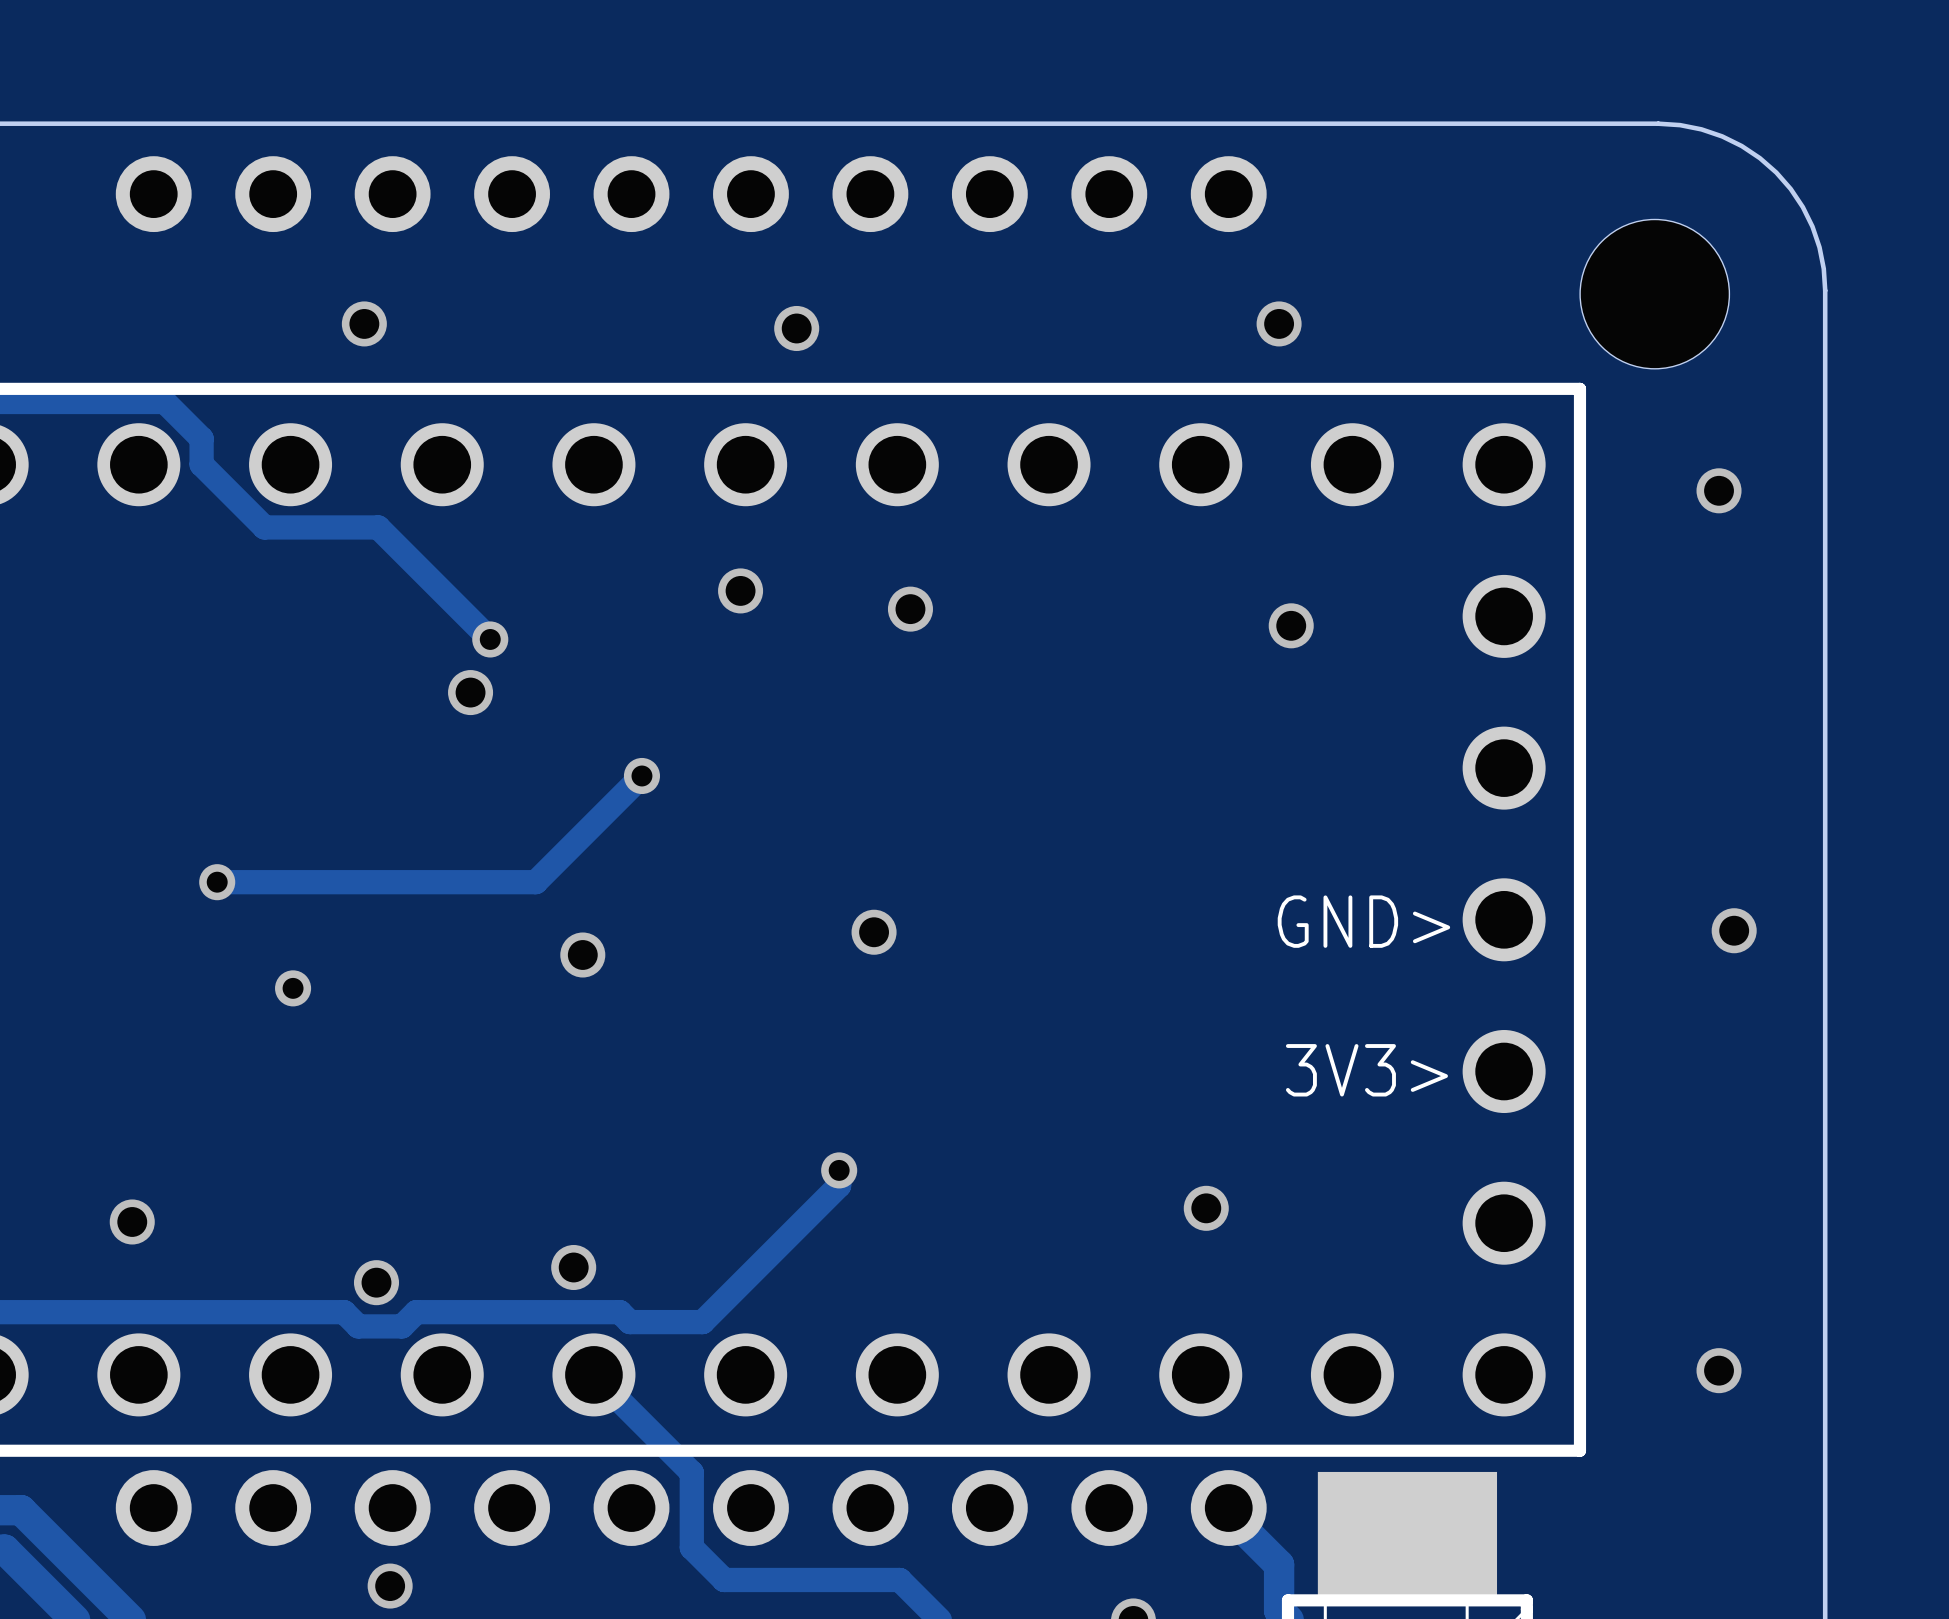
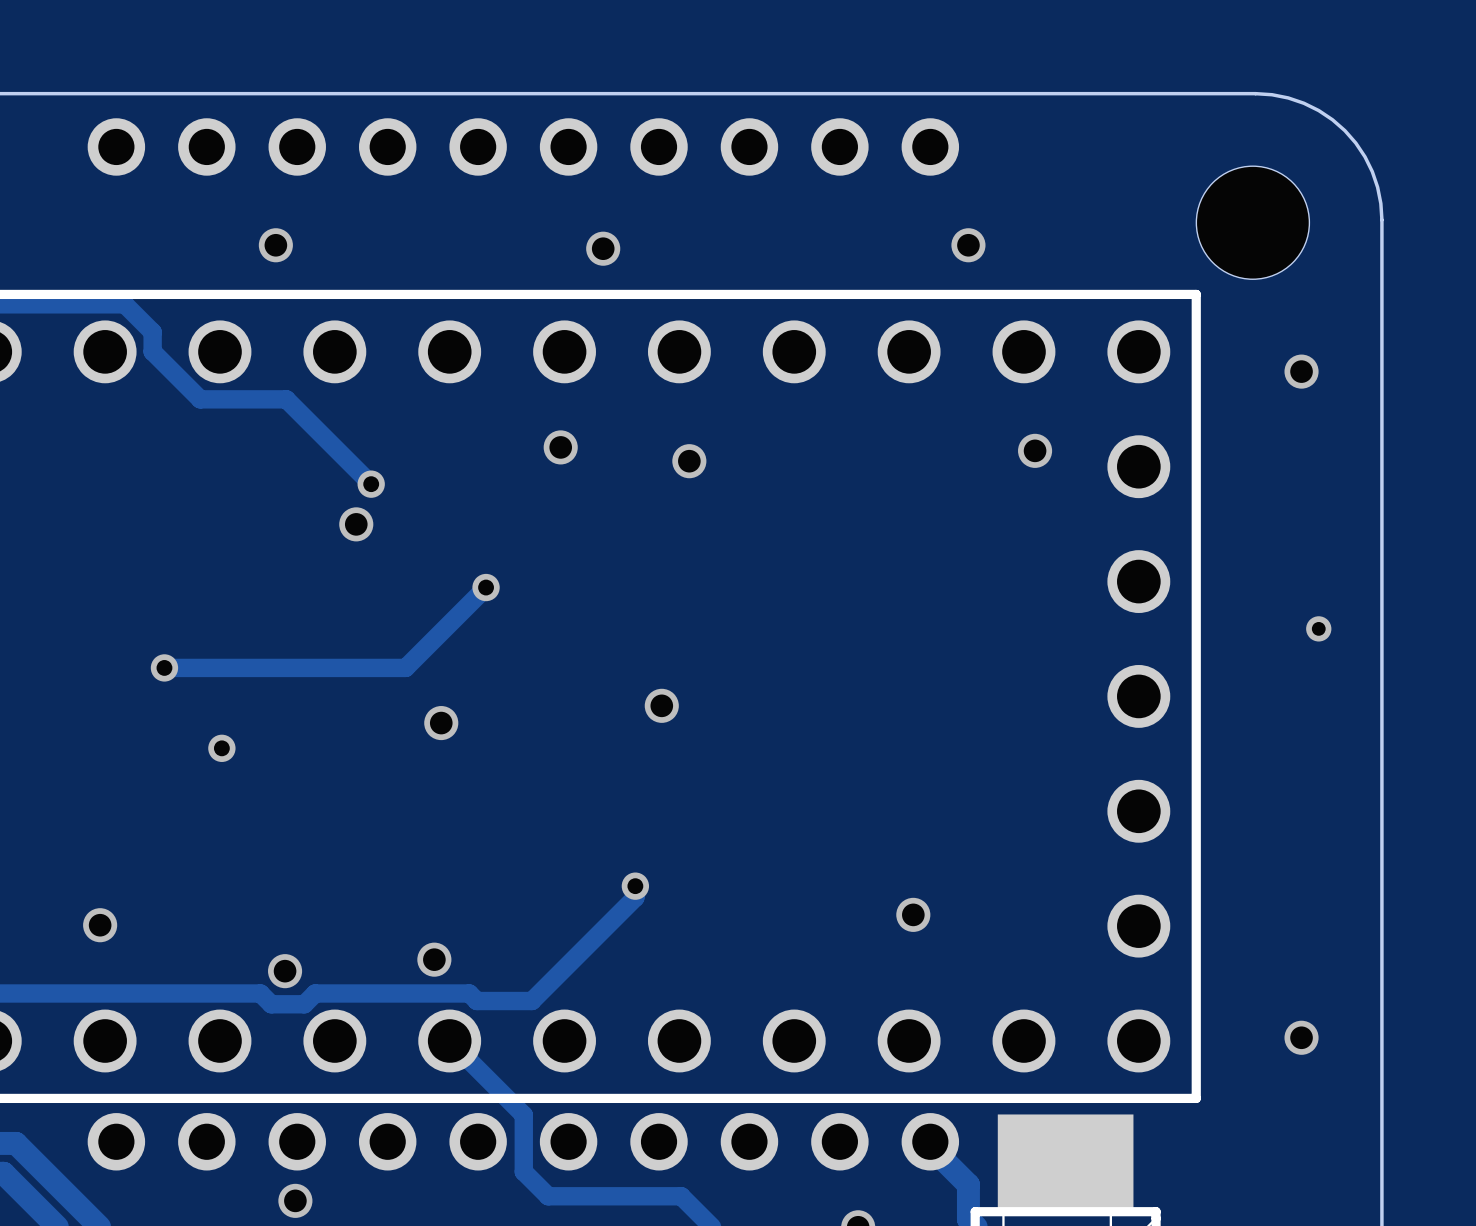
via position: (1291, 625) -> (1035, 450)
via: none -> (1318, 628)
text: GND> (1363, 921) -> none
via: (1734, 930) -> none
text: 3V3> (1366, 1070) -> none

